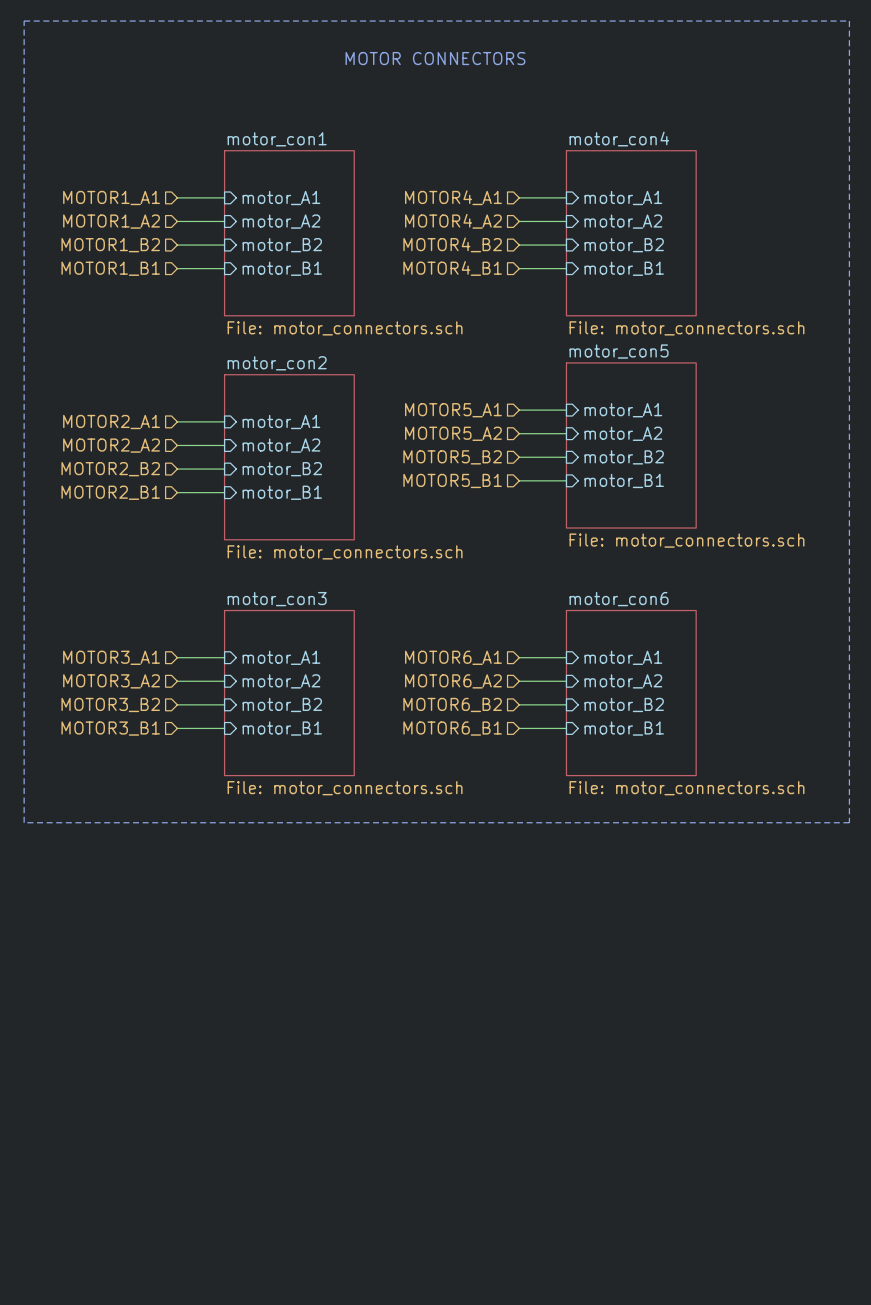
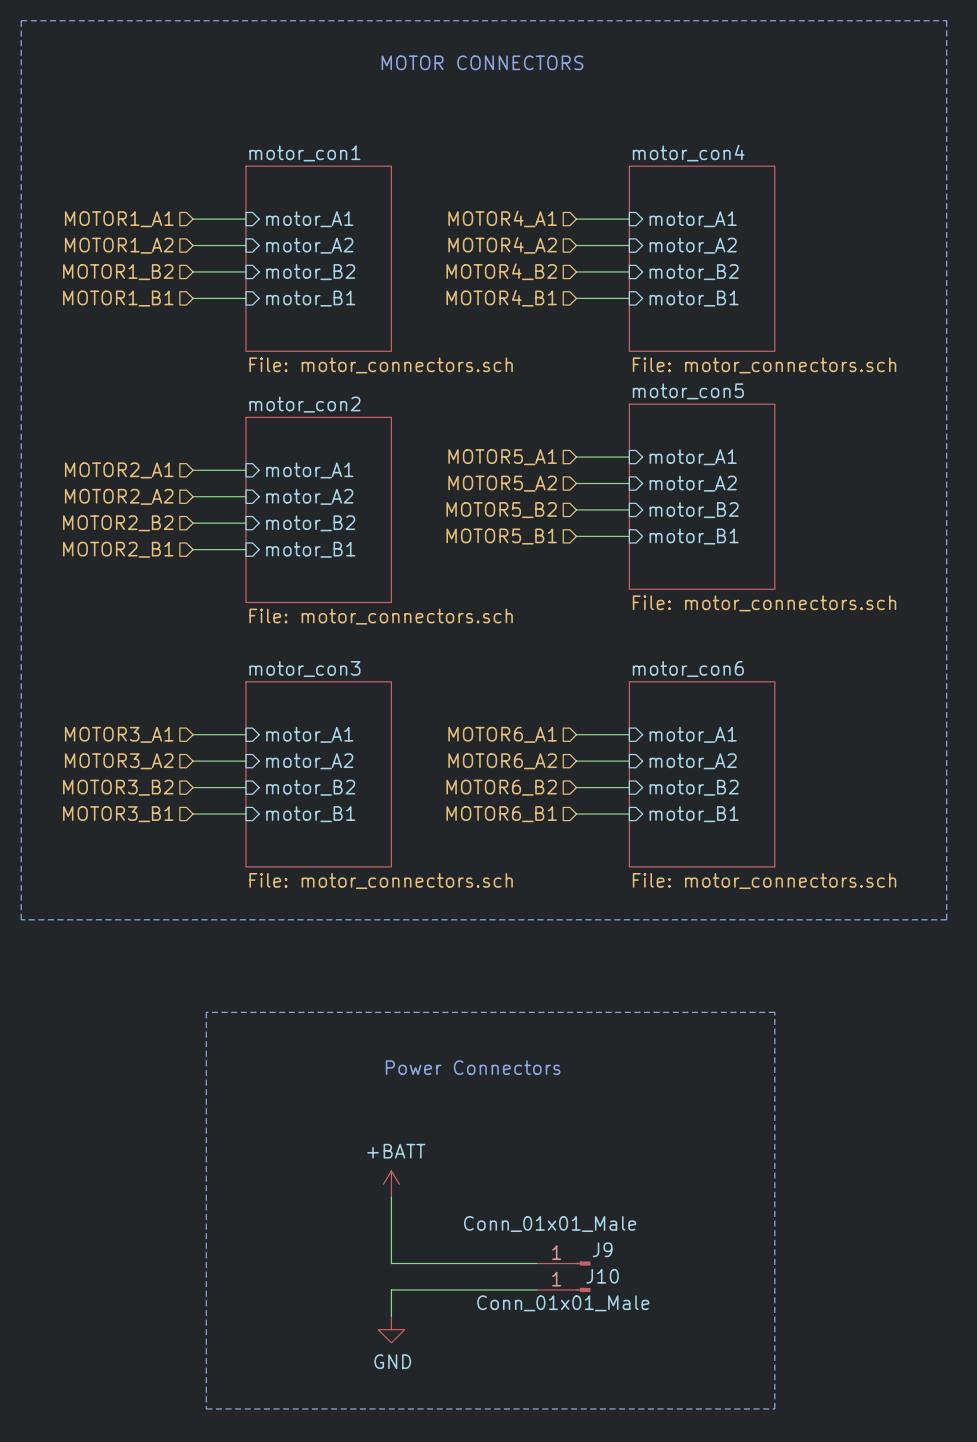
line: none -> (206, 1012) (774, 1012) (774, 1408) (206, 1408) (206, 1012)
text: none -> Power Connectors (473, 1067)
power symbol: none -> +BATT (391, 1184)
wire: none -> (391, 1197) (391, 1263) (536, 1263)
J9: none -> Conn_01x01_Male (563, 1263)
wire: none -> (536, 1289) (391, 1289) (391, 1316)
J10: none -> Conn_01x01_Male (563, 1289)
power symbol: none -> GND (391, 1329)

